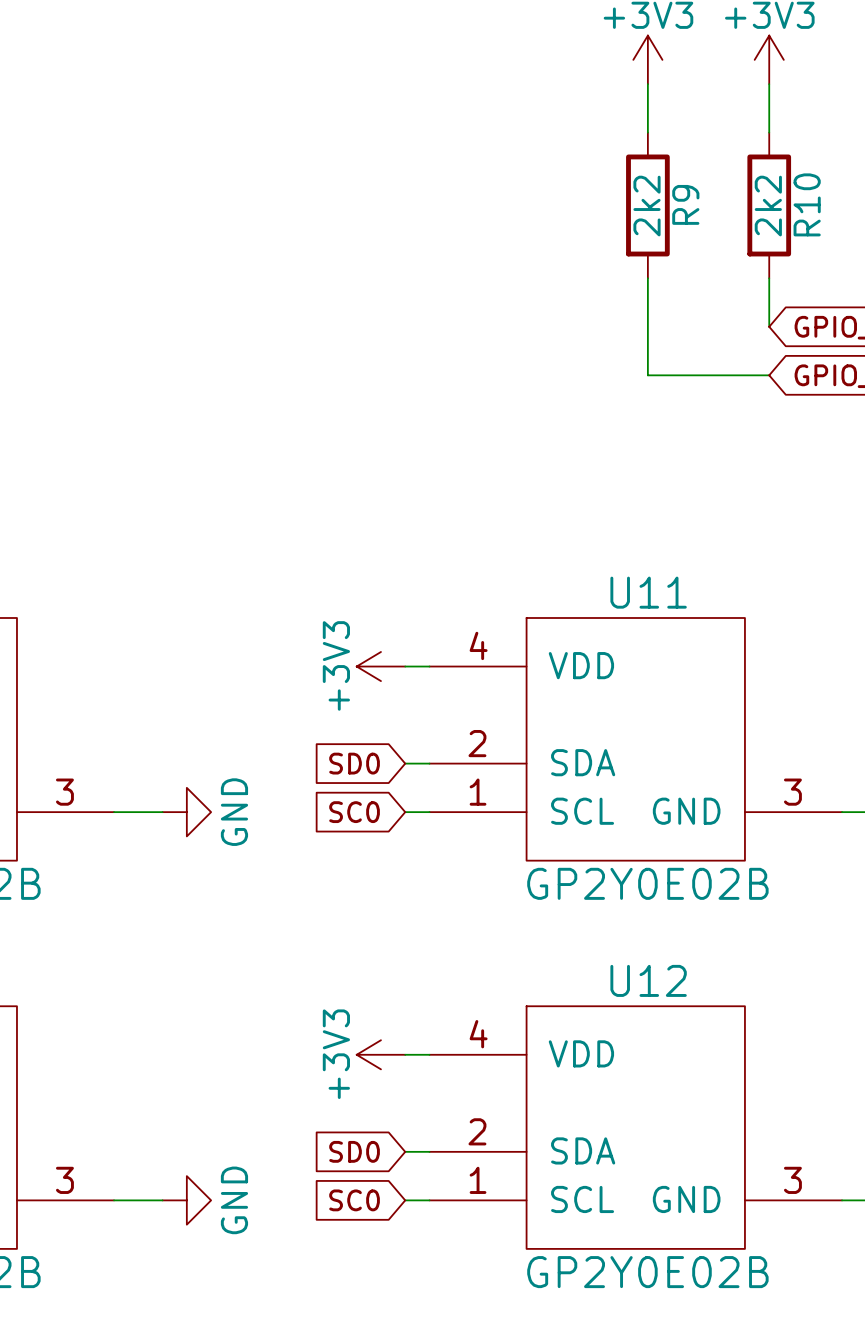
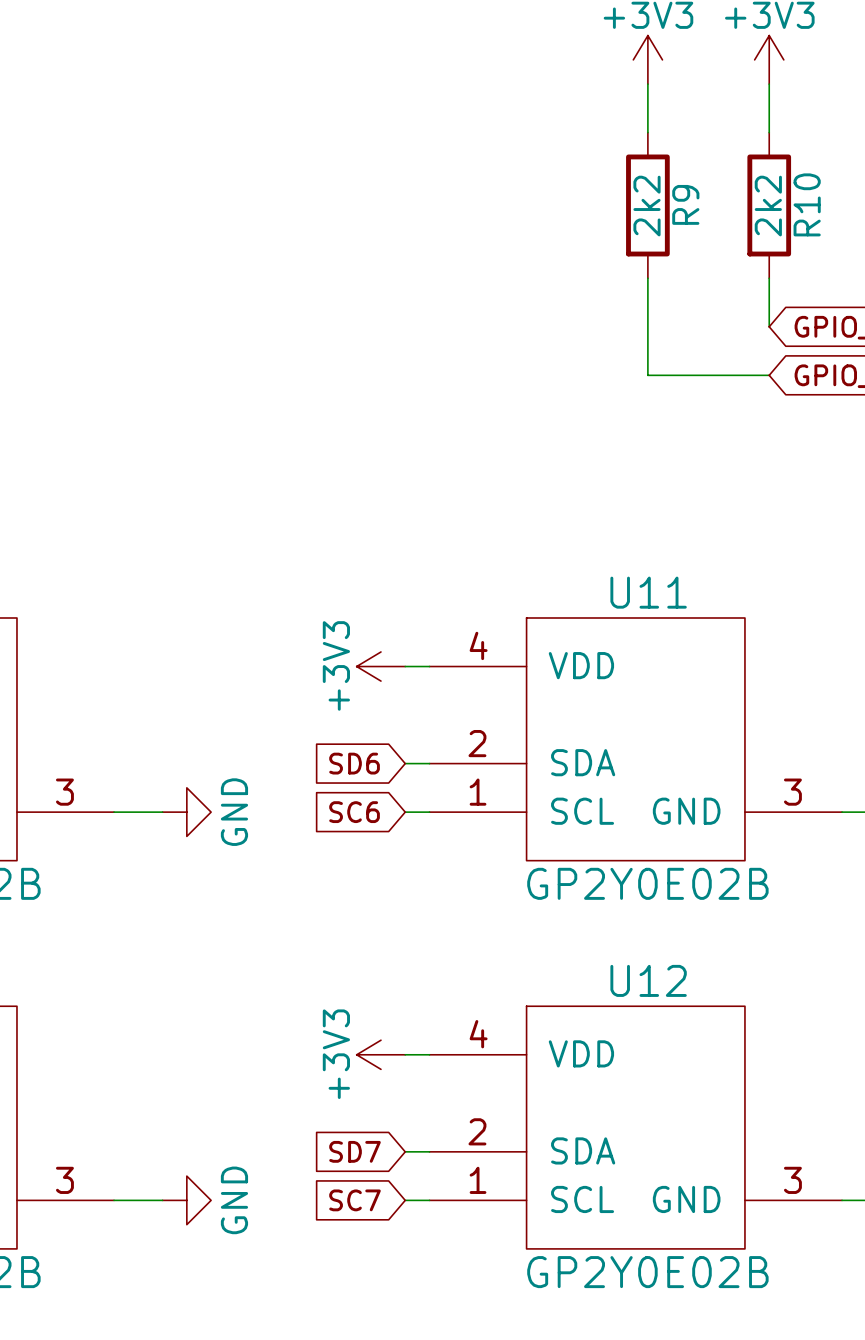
global label: SD0 (354, 763) -> SD6 (354, 763)
global label: SC0 (354, 812) -> SC6 (354, 812)
global label: SD0 (354, 1151) -> SD7 (354, 1151)
global label: SC0 (354, 1200) -> SC7 (354, 1200)

